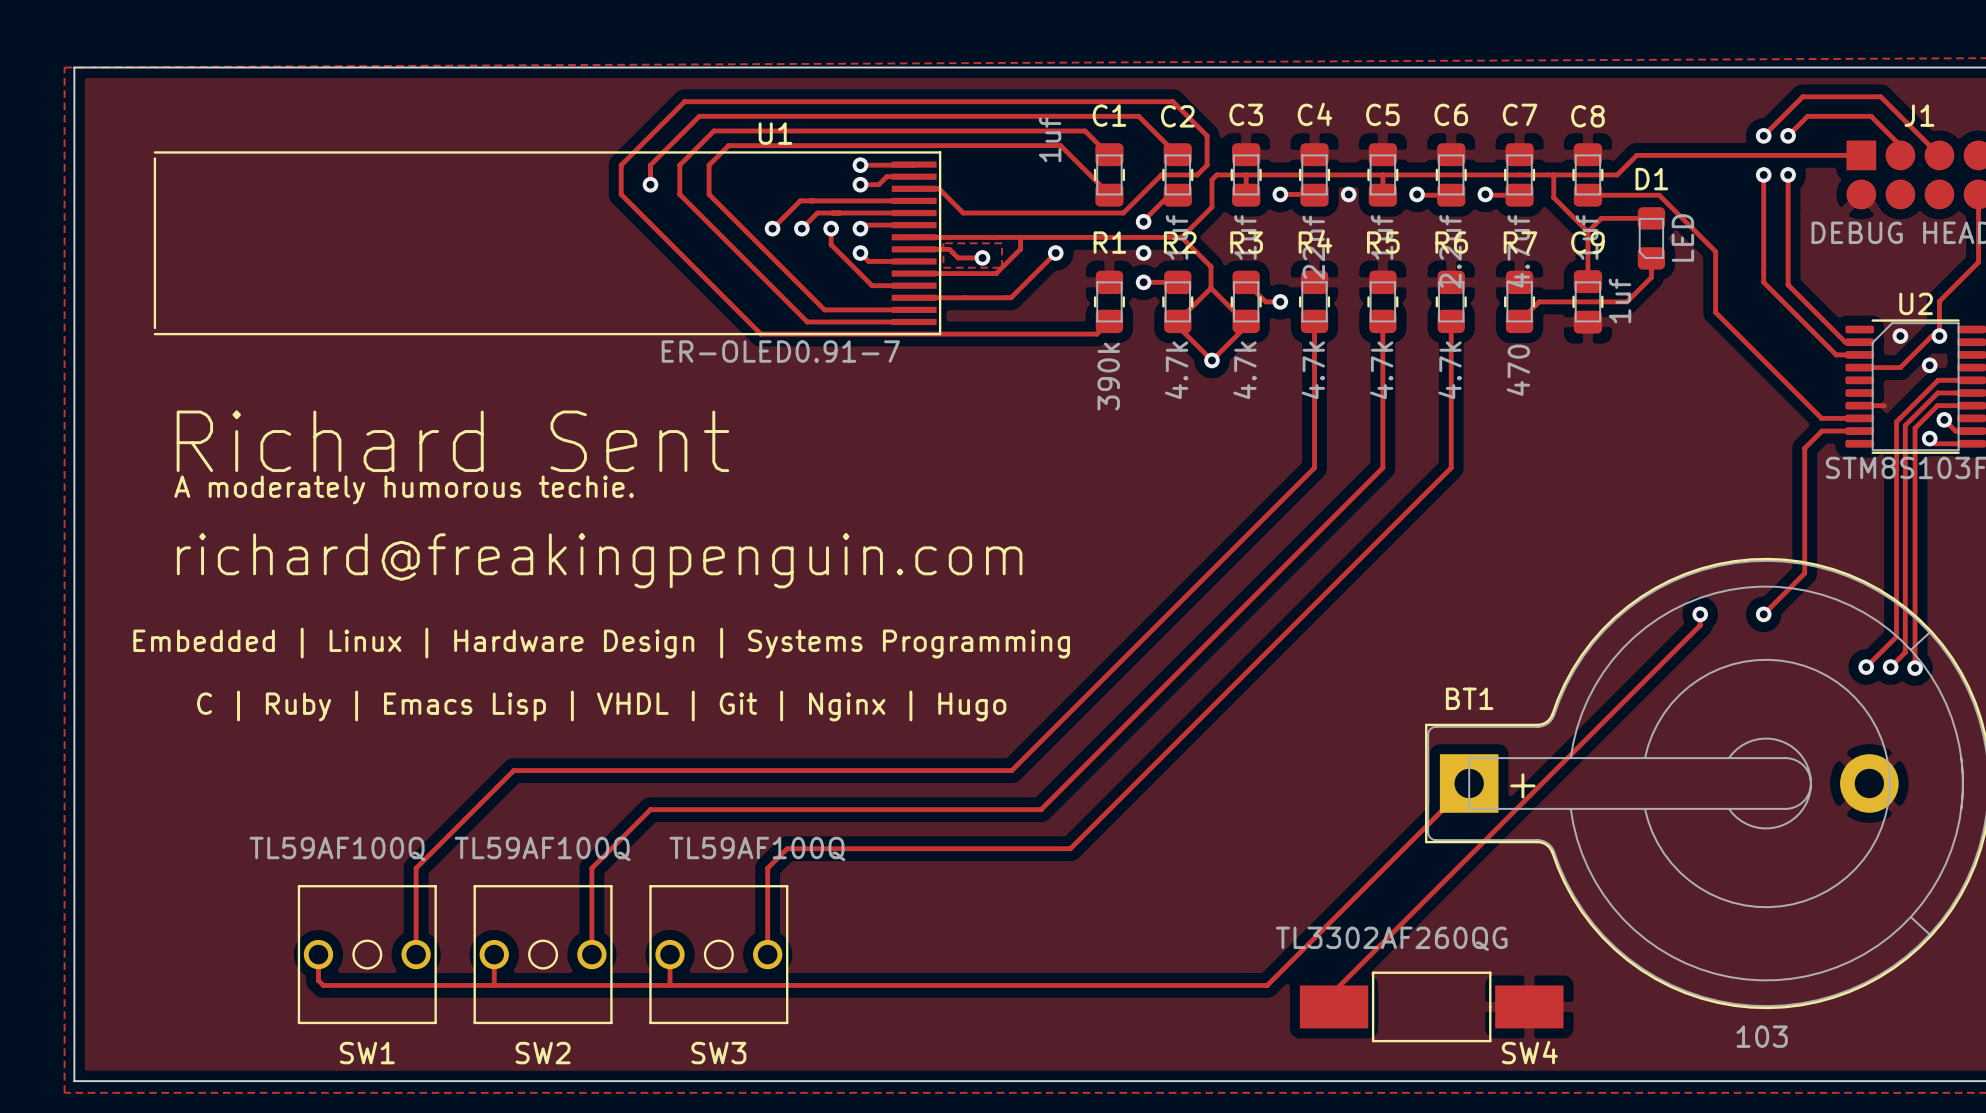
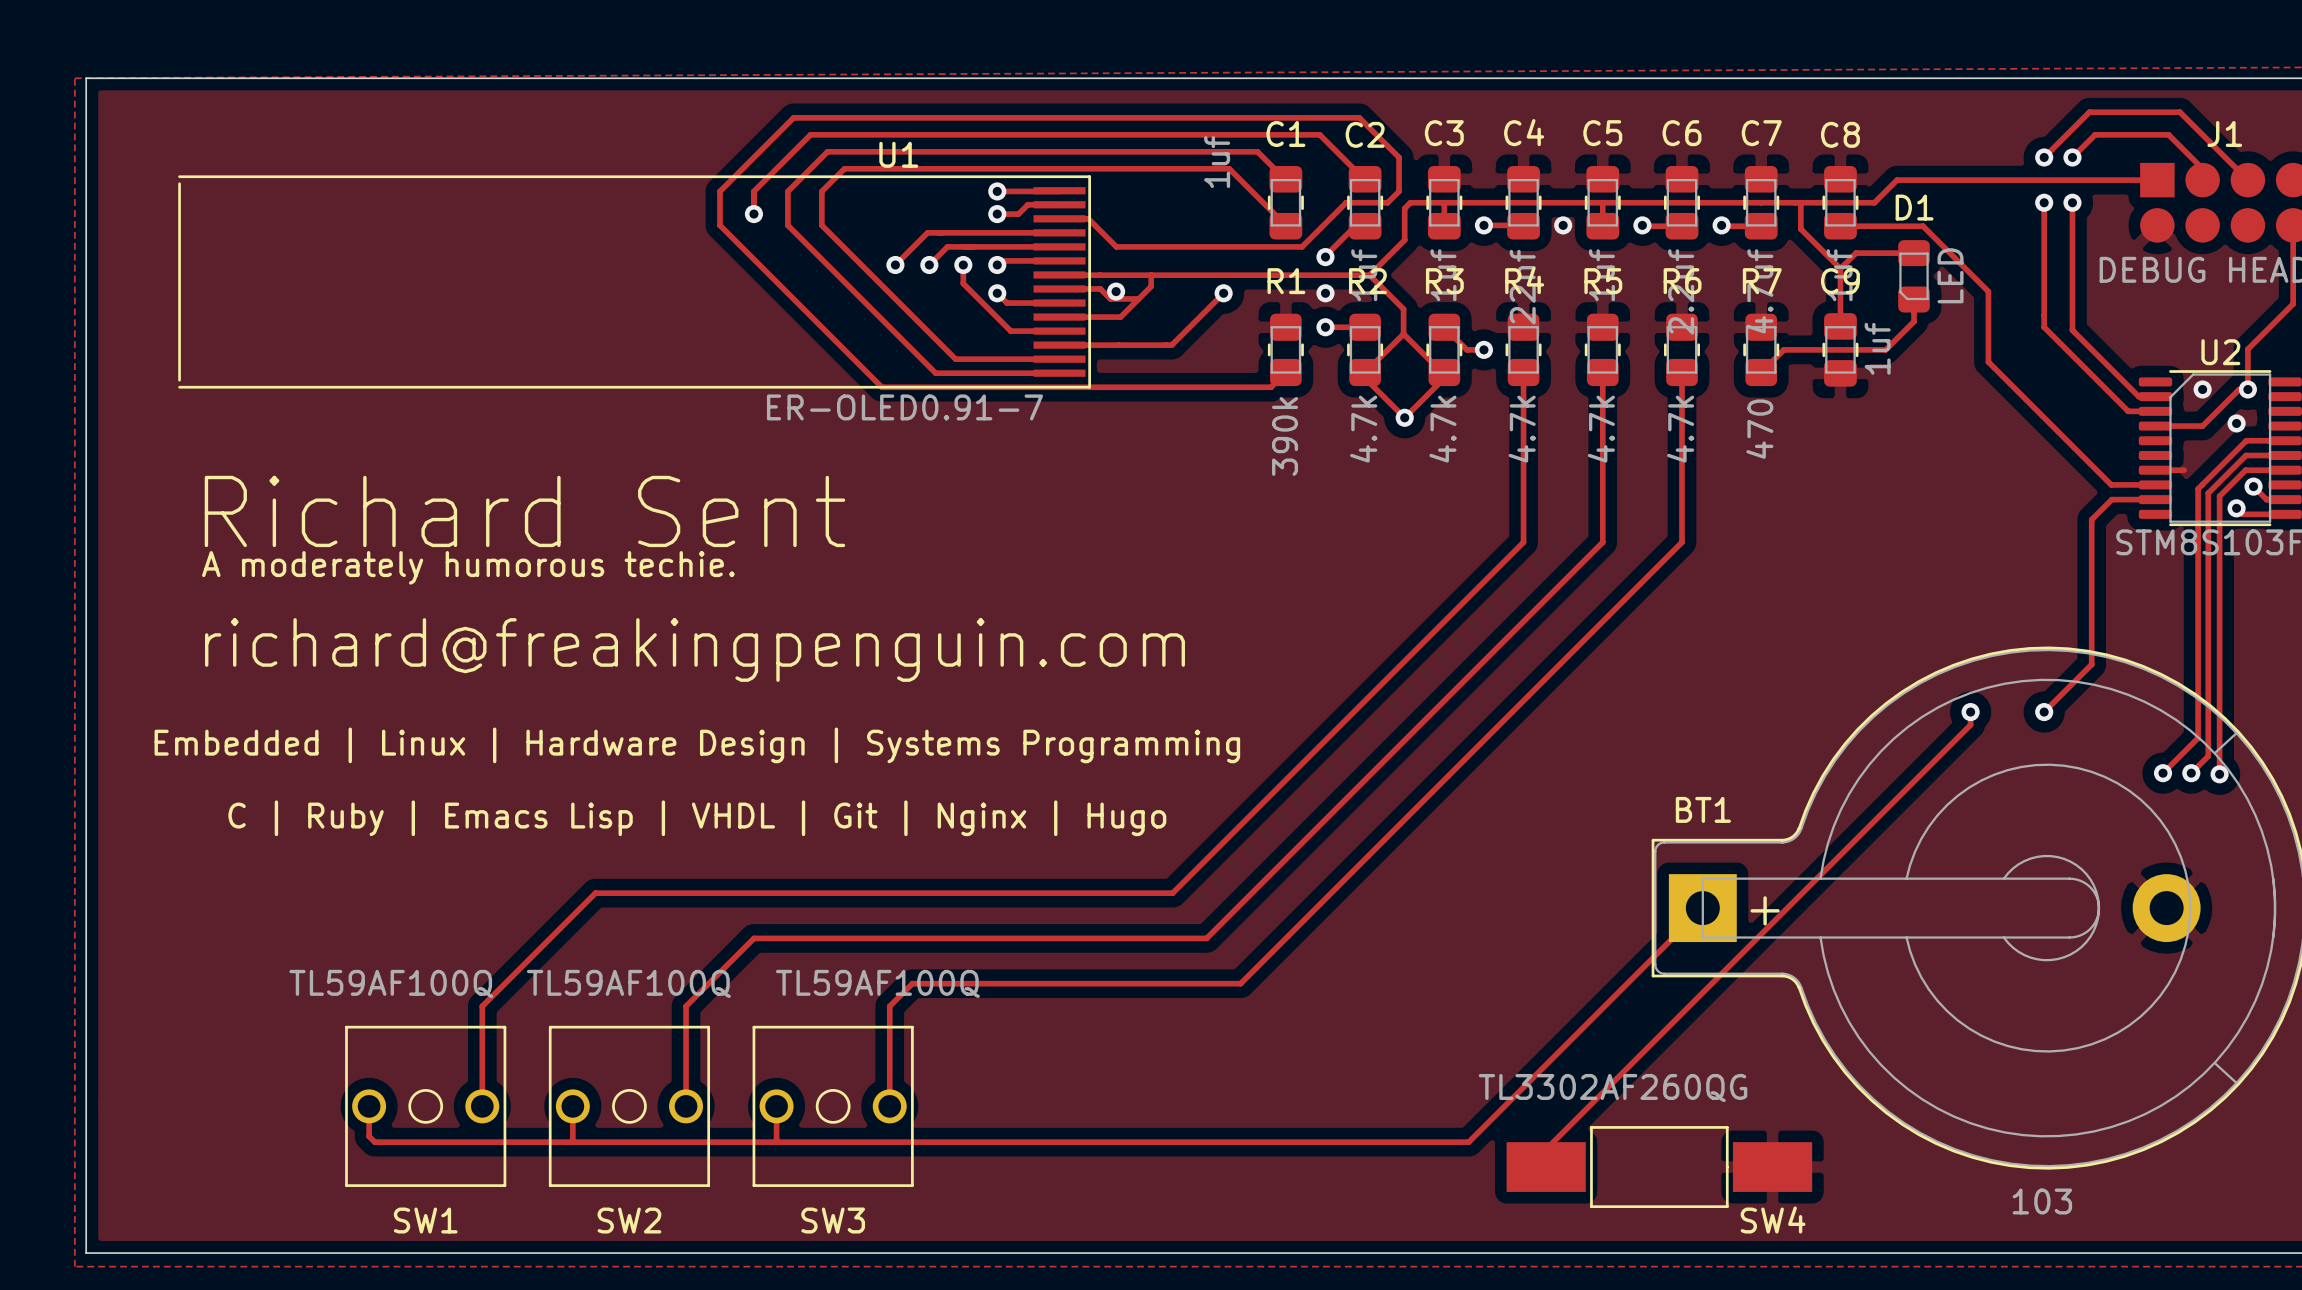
track: (1020, 237) (1020, 249) (996, 273) (966, 273) -> (1151, 275) (1151, 286) (1120, 317)
zone outline: (943, 243) (943, 267) (1002, 267) (1002, 243) (943, 243) -> none
via position: (982, 257) -> (1116, 291)

